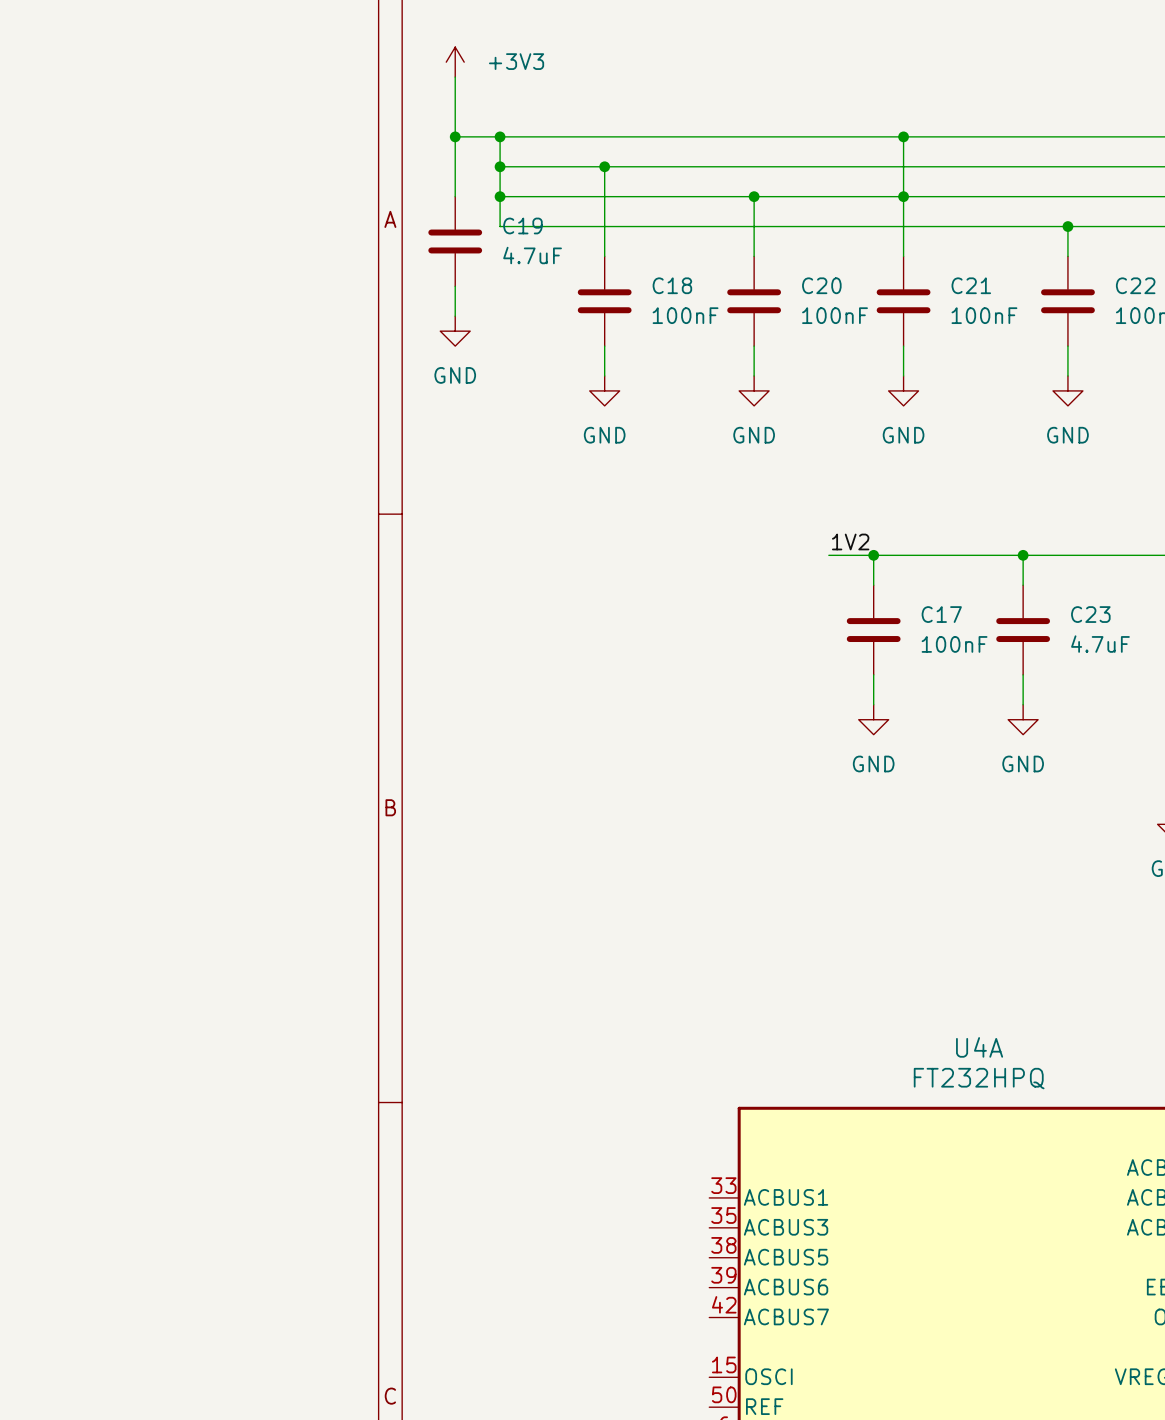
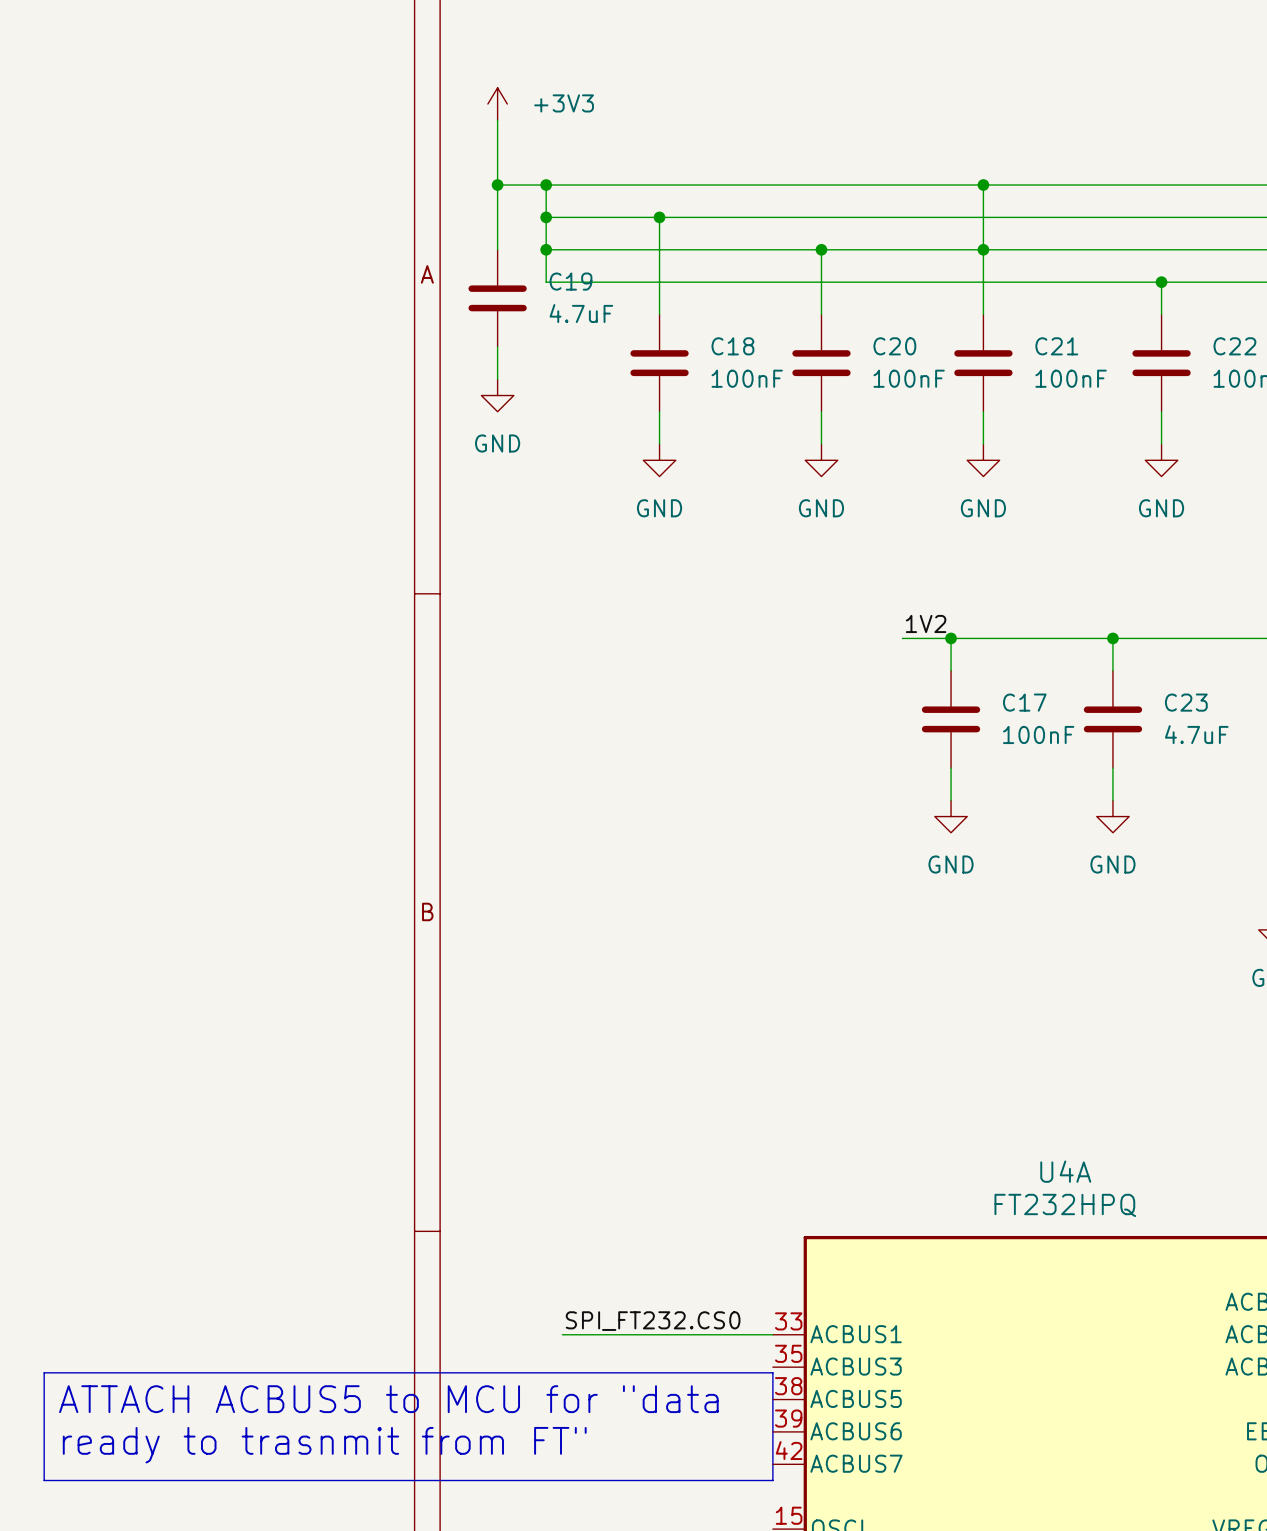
label: none -> SPI_FT232.CS0 (653, 1321)
wire: none -> (562, 1334) (772, 1334)
line: none -> (44, 1372) (772, 1372) (772, 1480) (44, 1480) (44, 1372)
text: none -> ATTACH ACBUS5 to MCU for "data (388, 1399)
text: none -> ready to trasnmit from FT" (324, 1445)

